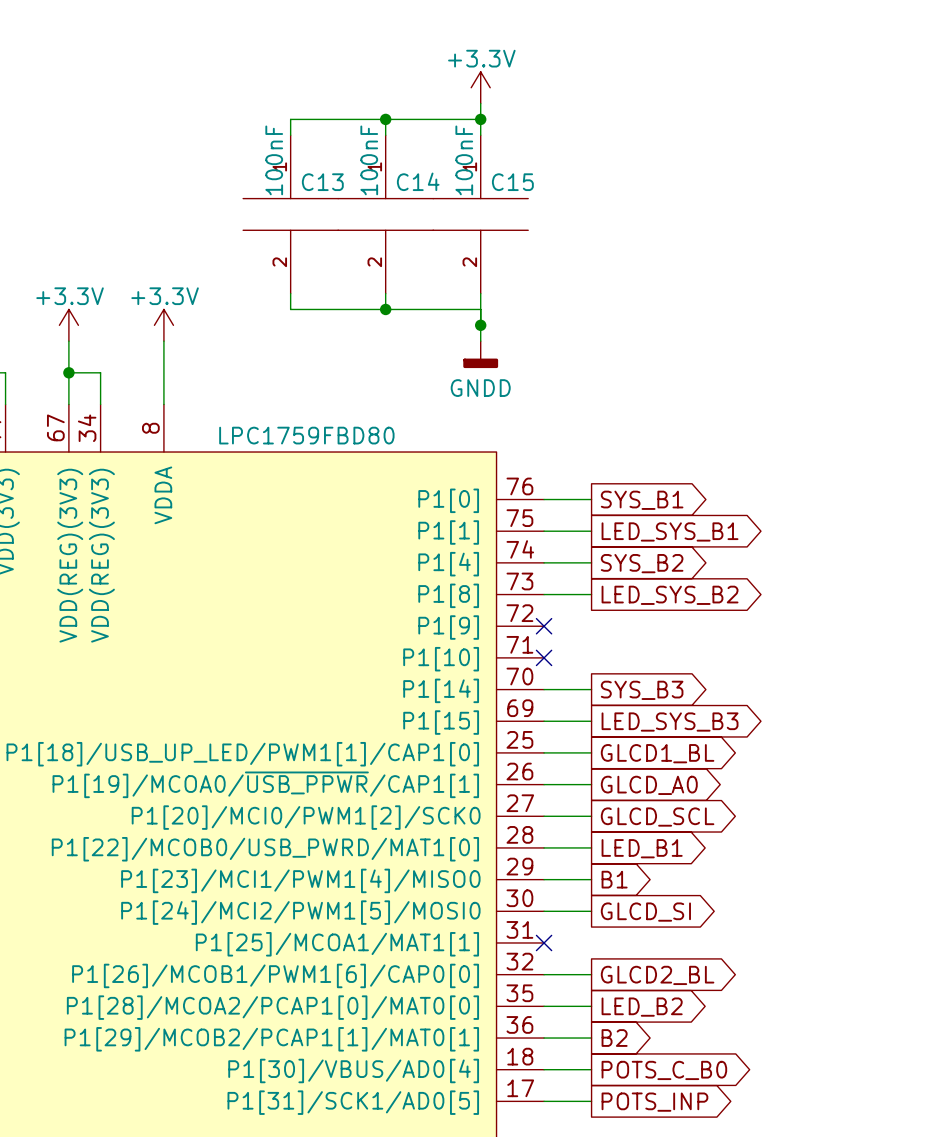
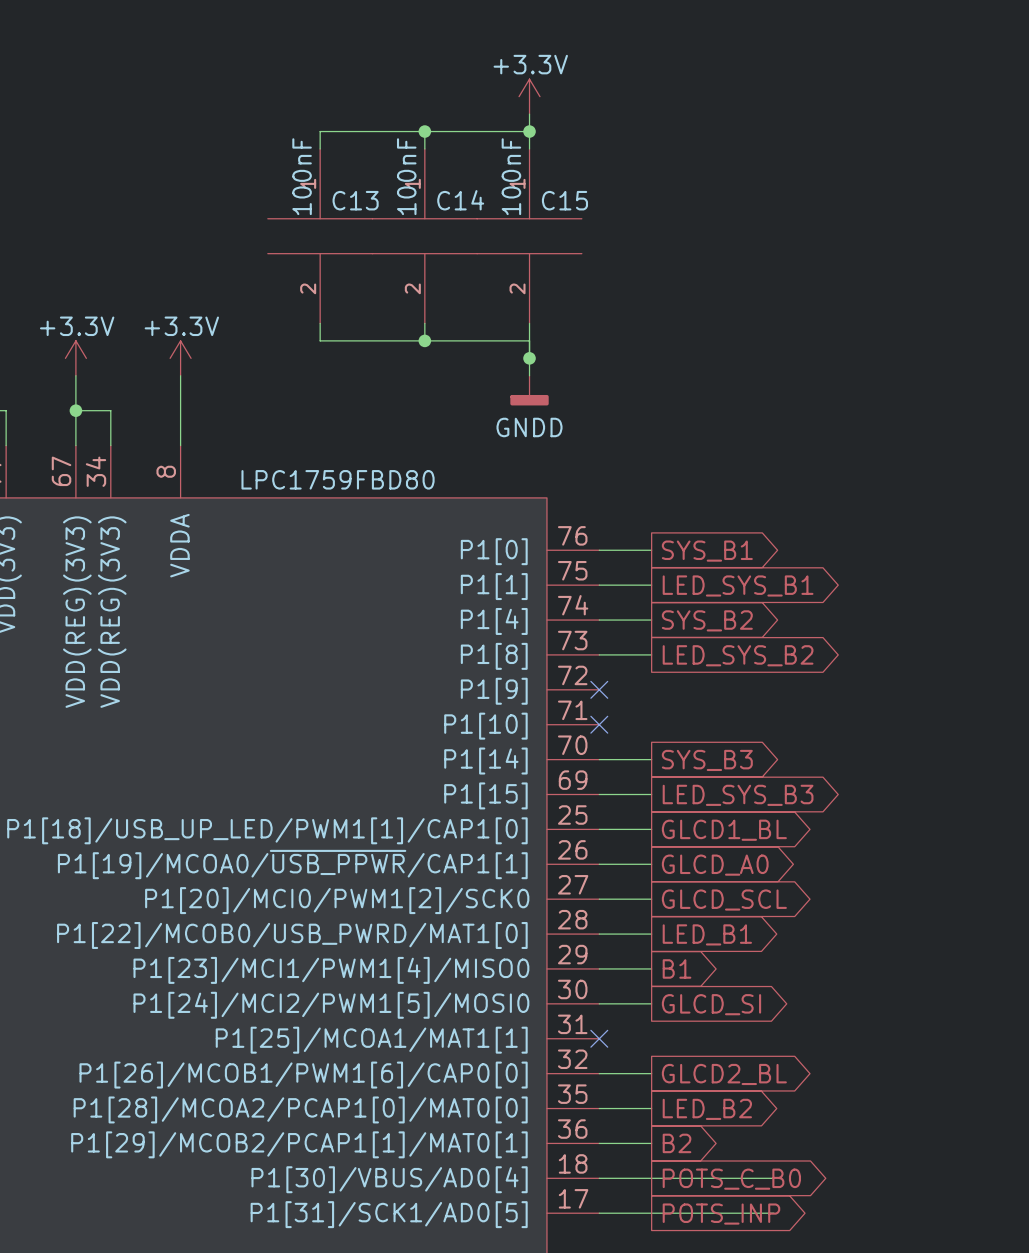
wire: none -> (651, 1178) (773, 1178)
wire: none -> (651, 1213) (773, 1213)

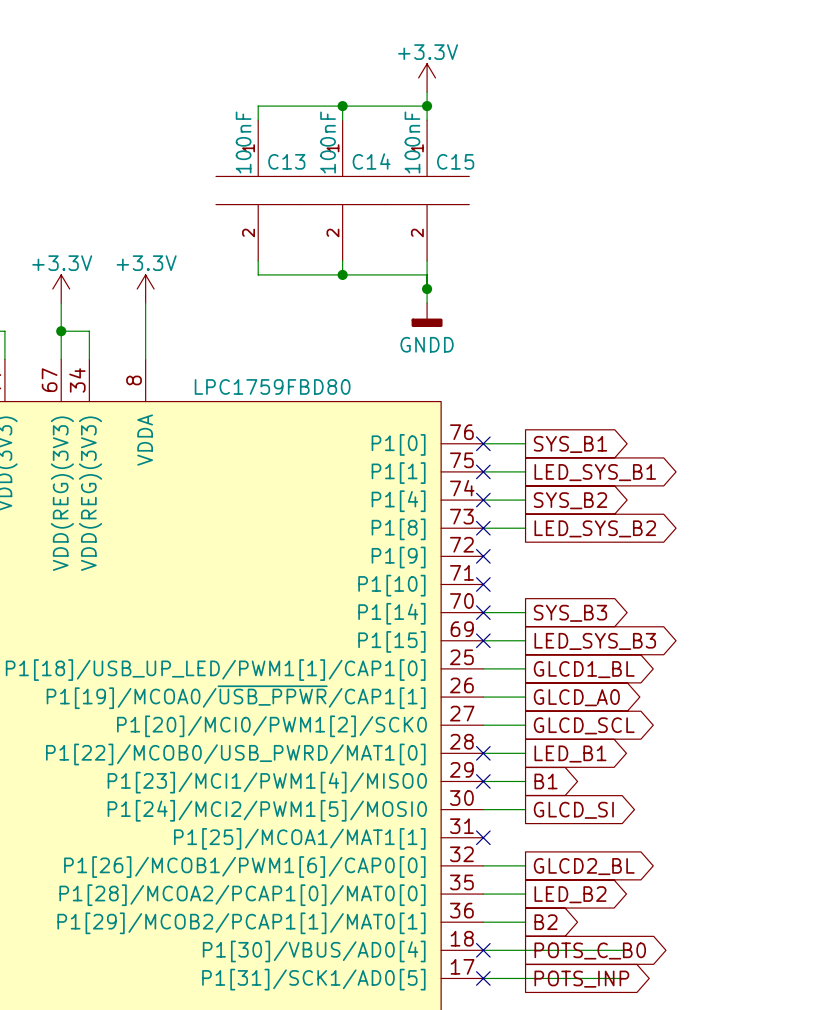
no-connect mark: none -> (483, 443)
no-connect mark: none -> (483, 471)
no-connect mark: none -> (483, 500)
no-connect mark: none -> (483, 528)
no-connect mark: none -> (483, 612)
no-connect mark: none -> (483, 640)
no-connect mark: none -> (483, 753)
no-connect mark: none -> (483, 781)
no-connect mark: none -> (483, 950)
no-connect mark: none -> (483, 978)

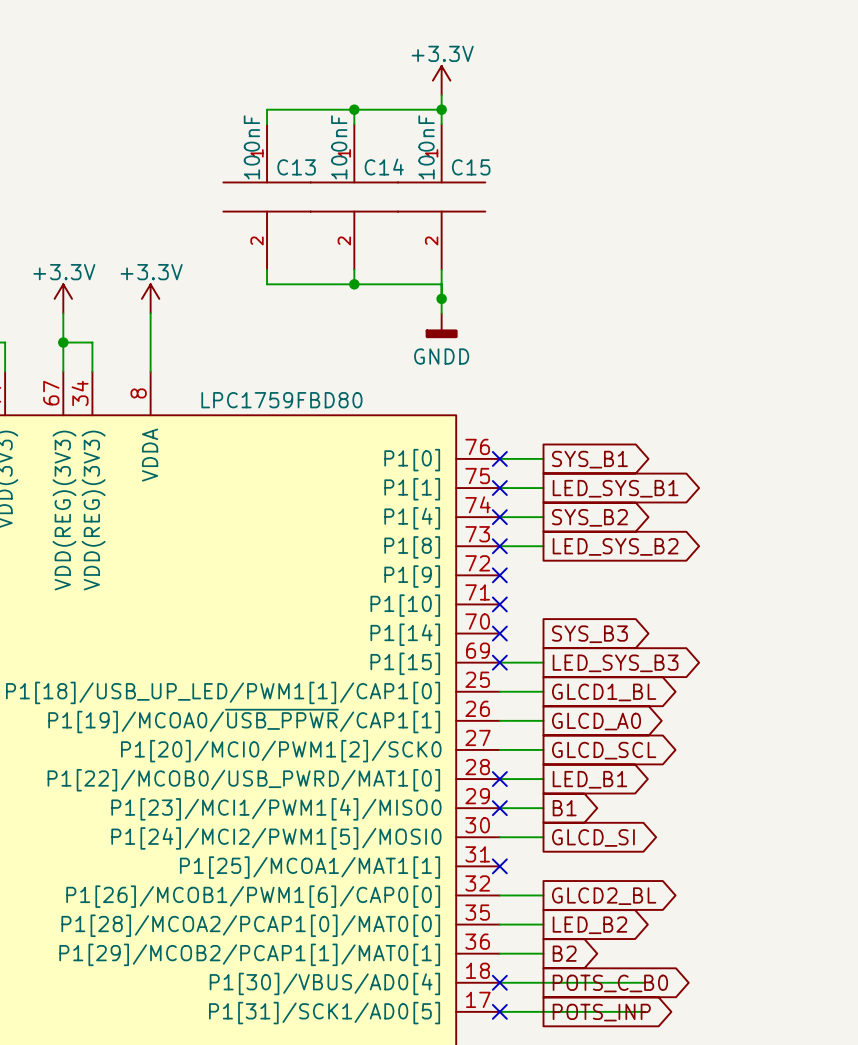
wire: (483, 612) (525, 612) -> none

